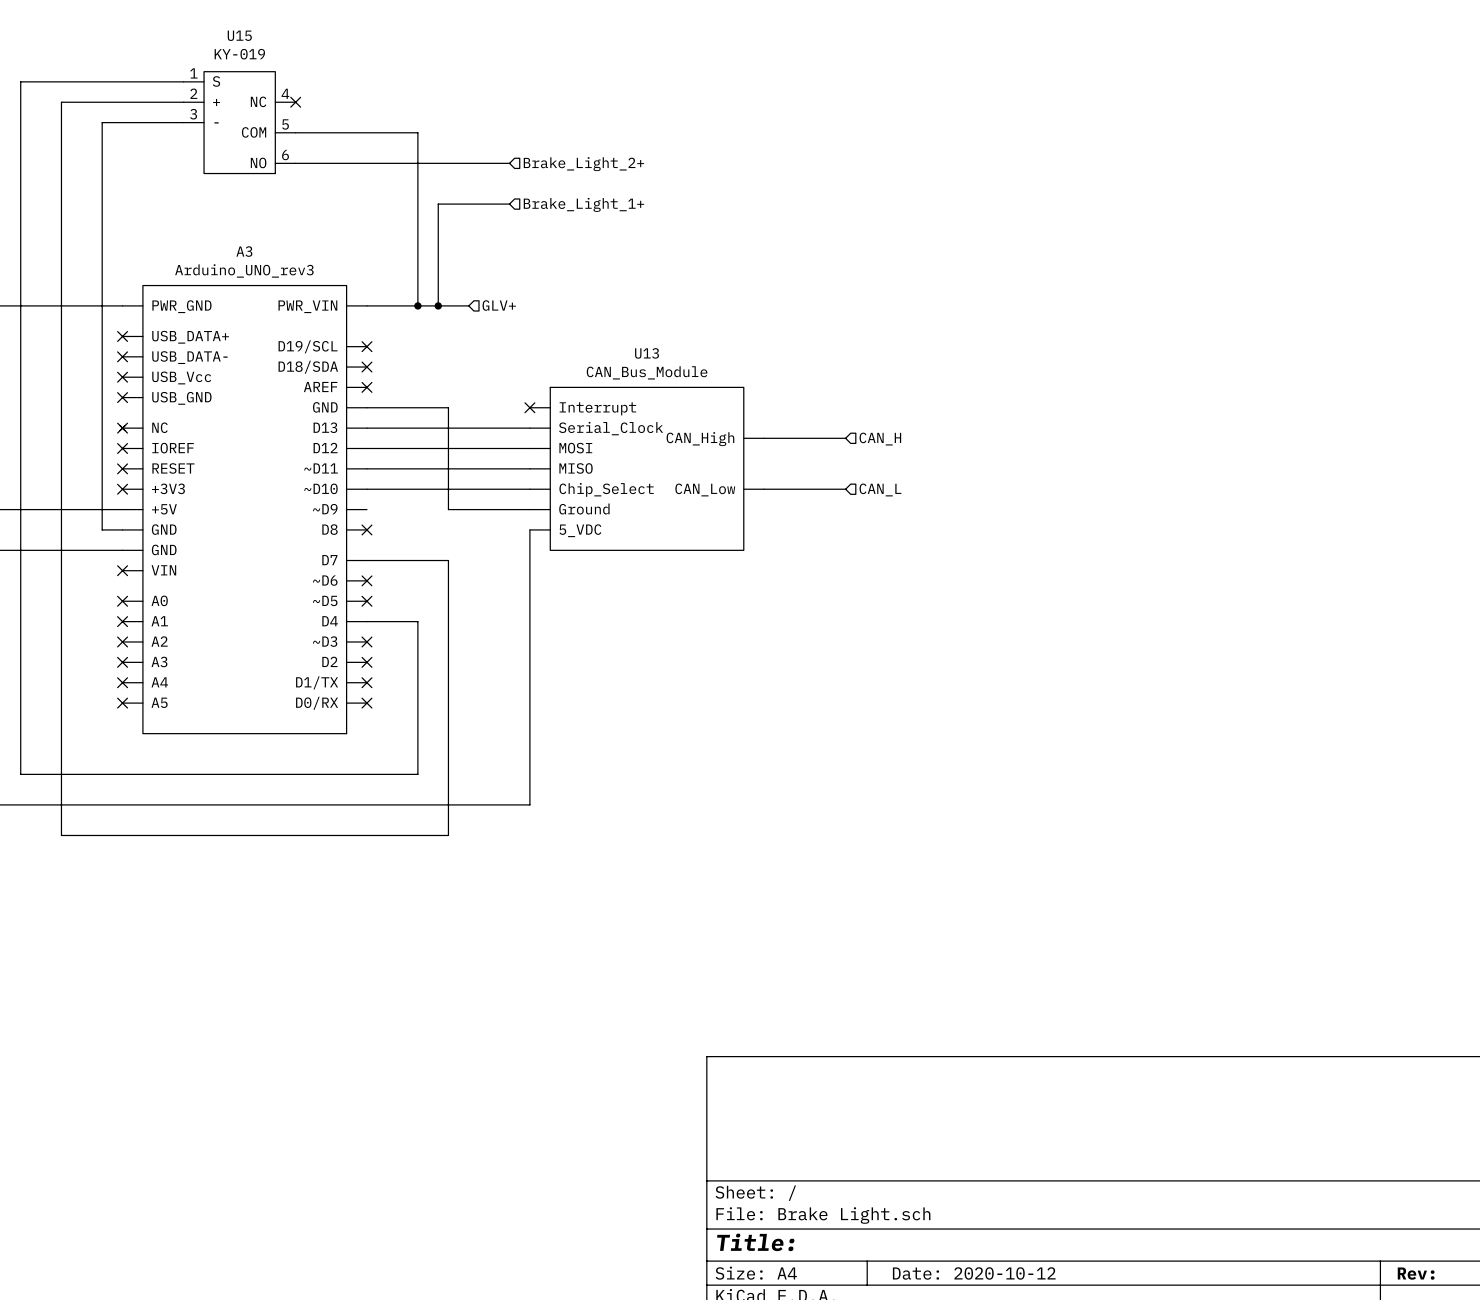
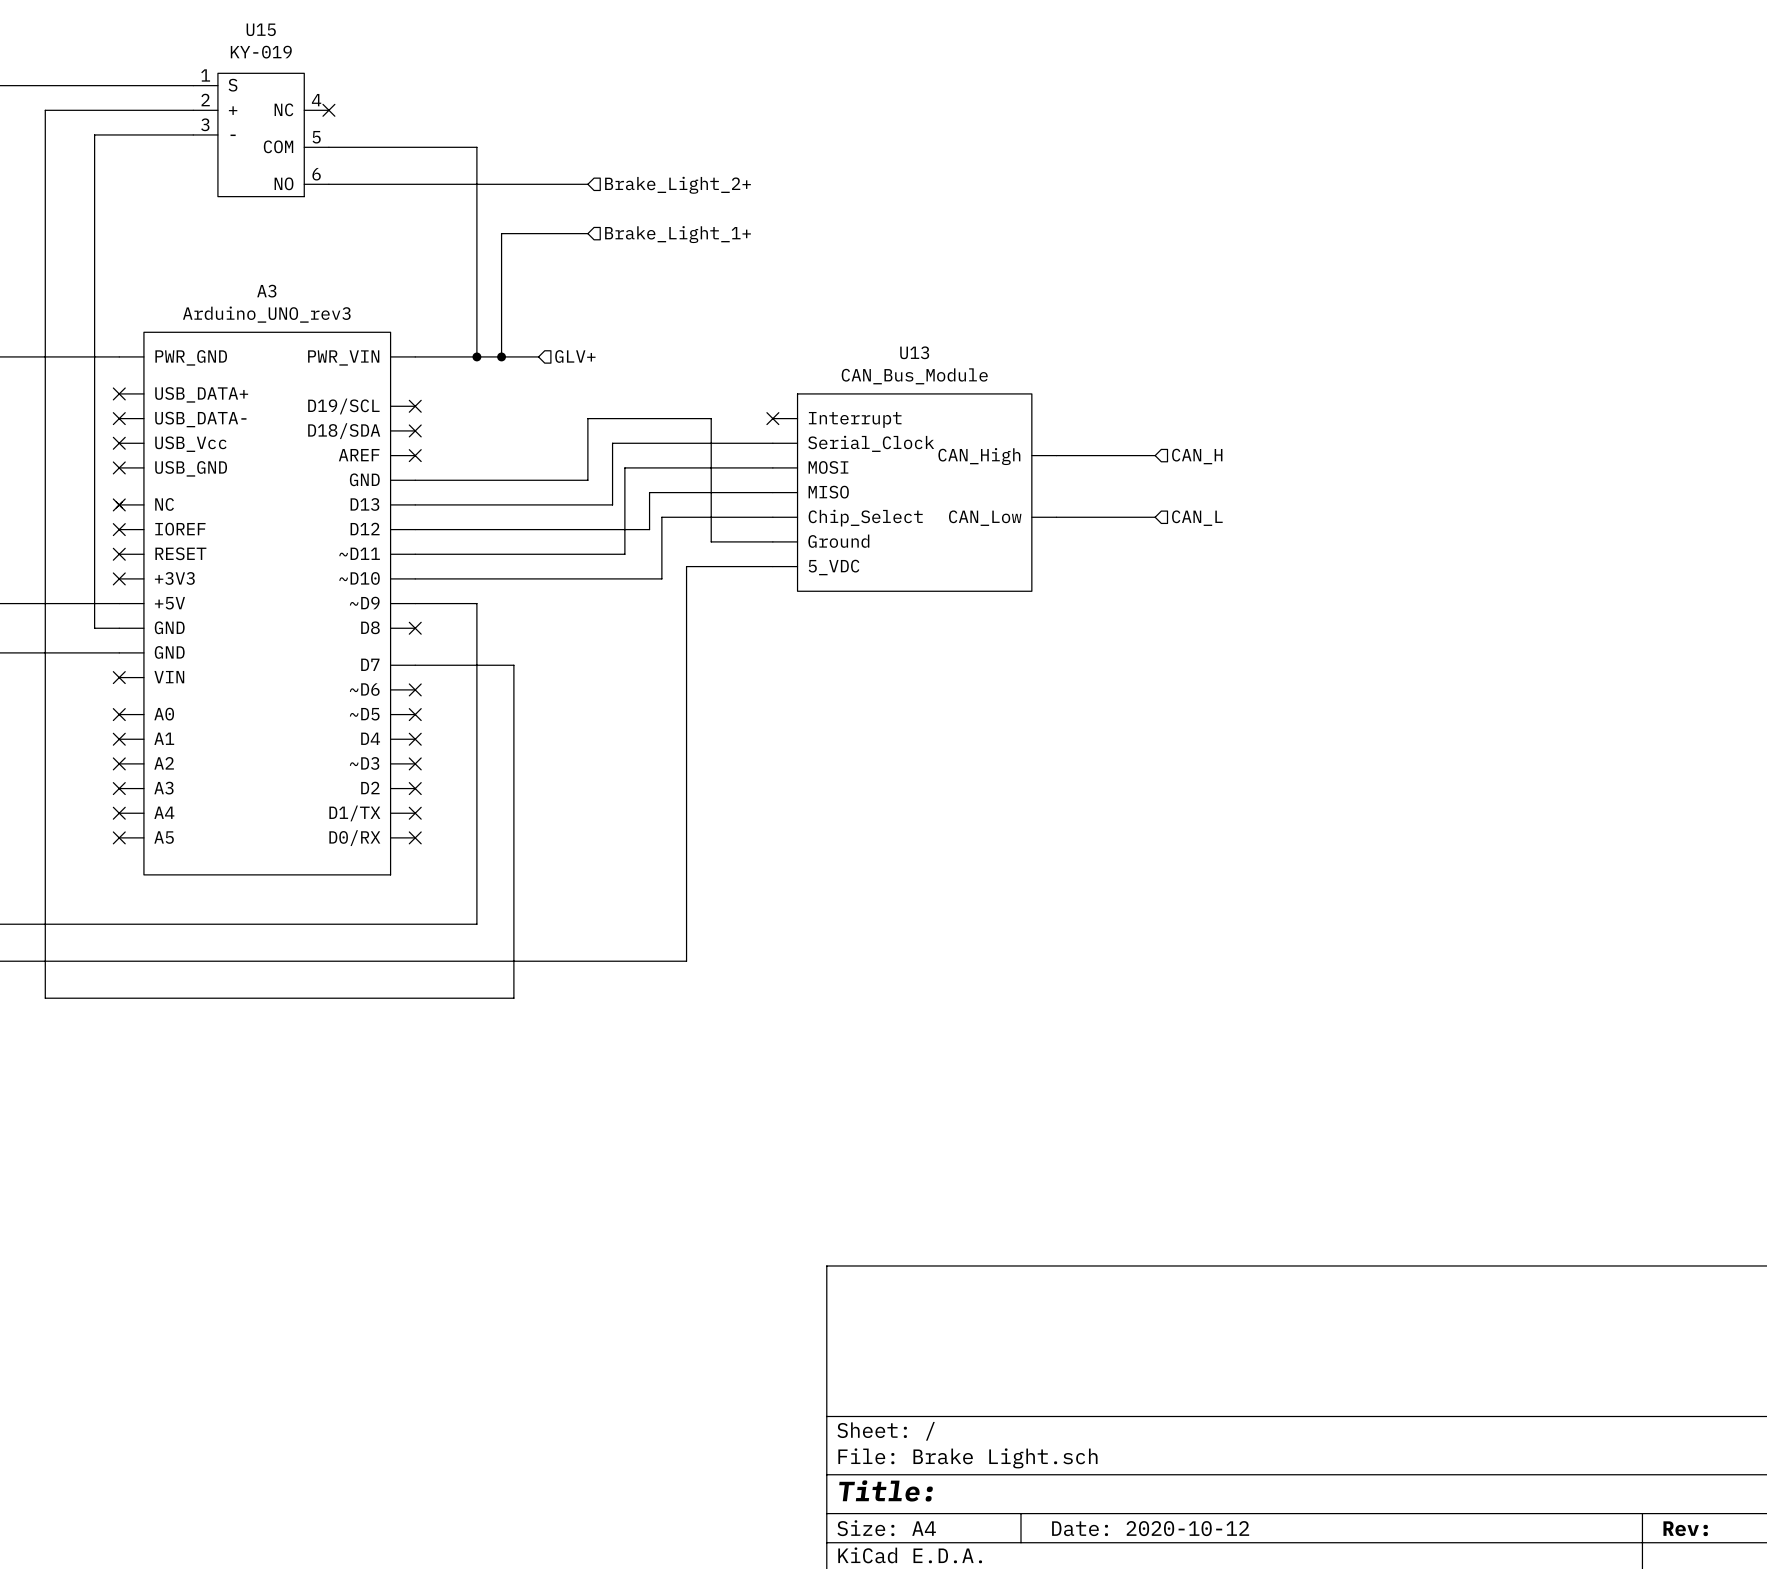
no-connect mark: none -> (772, 418)
wire: none -> (772, 443) (612, 443) (612, 504)
wire: none -> (772, 467) (624, 467) (624, 554) (612, 554)
wire: (448, 407) (448, 509) (529, 509) -> (513, 480) (587, 480) (587, 418) (711, 418) (711, 541) (772, 541)
no-connect mark: (529, 407) -> none
wire: none -> (772, 492) (649, 492) (649, 529) (612, 529)
wire: none -> (772, 517) (661, 517) (661, 578) (612, 578)
wire: (764, 438) (845, 438) -> (1056, 455) (1155, 455)
hierarchical label position: CAN_H (880, 439) -> CAN_H (1197, 456)
U13 position: (647, 468) -> (914, 492)
wire: (764, 489) (845, 489) -> (1056, 517) (1155, 517)
hierarchical label position: CAN_L (880, 489) -> CAN_L (1197, 518)
wire: (529, 529) (529, 804) -> (772, 566) (686, 566) (686, 961) (612, 961)
wire: (366, 621) (417, 621) -> (415, 603) (476, 603) (476, 739)
no-connect mark: none -> (415, 739)

